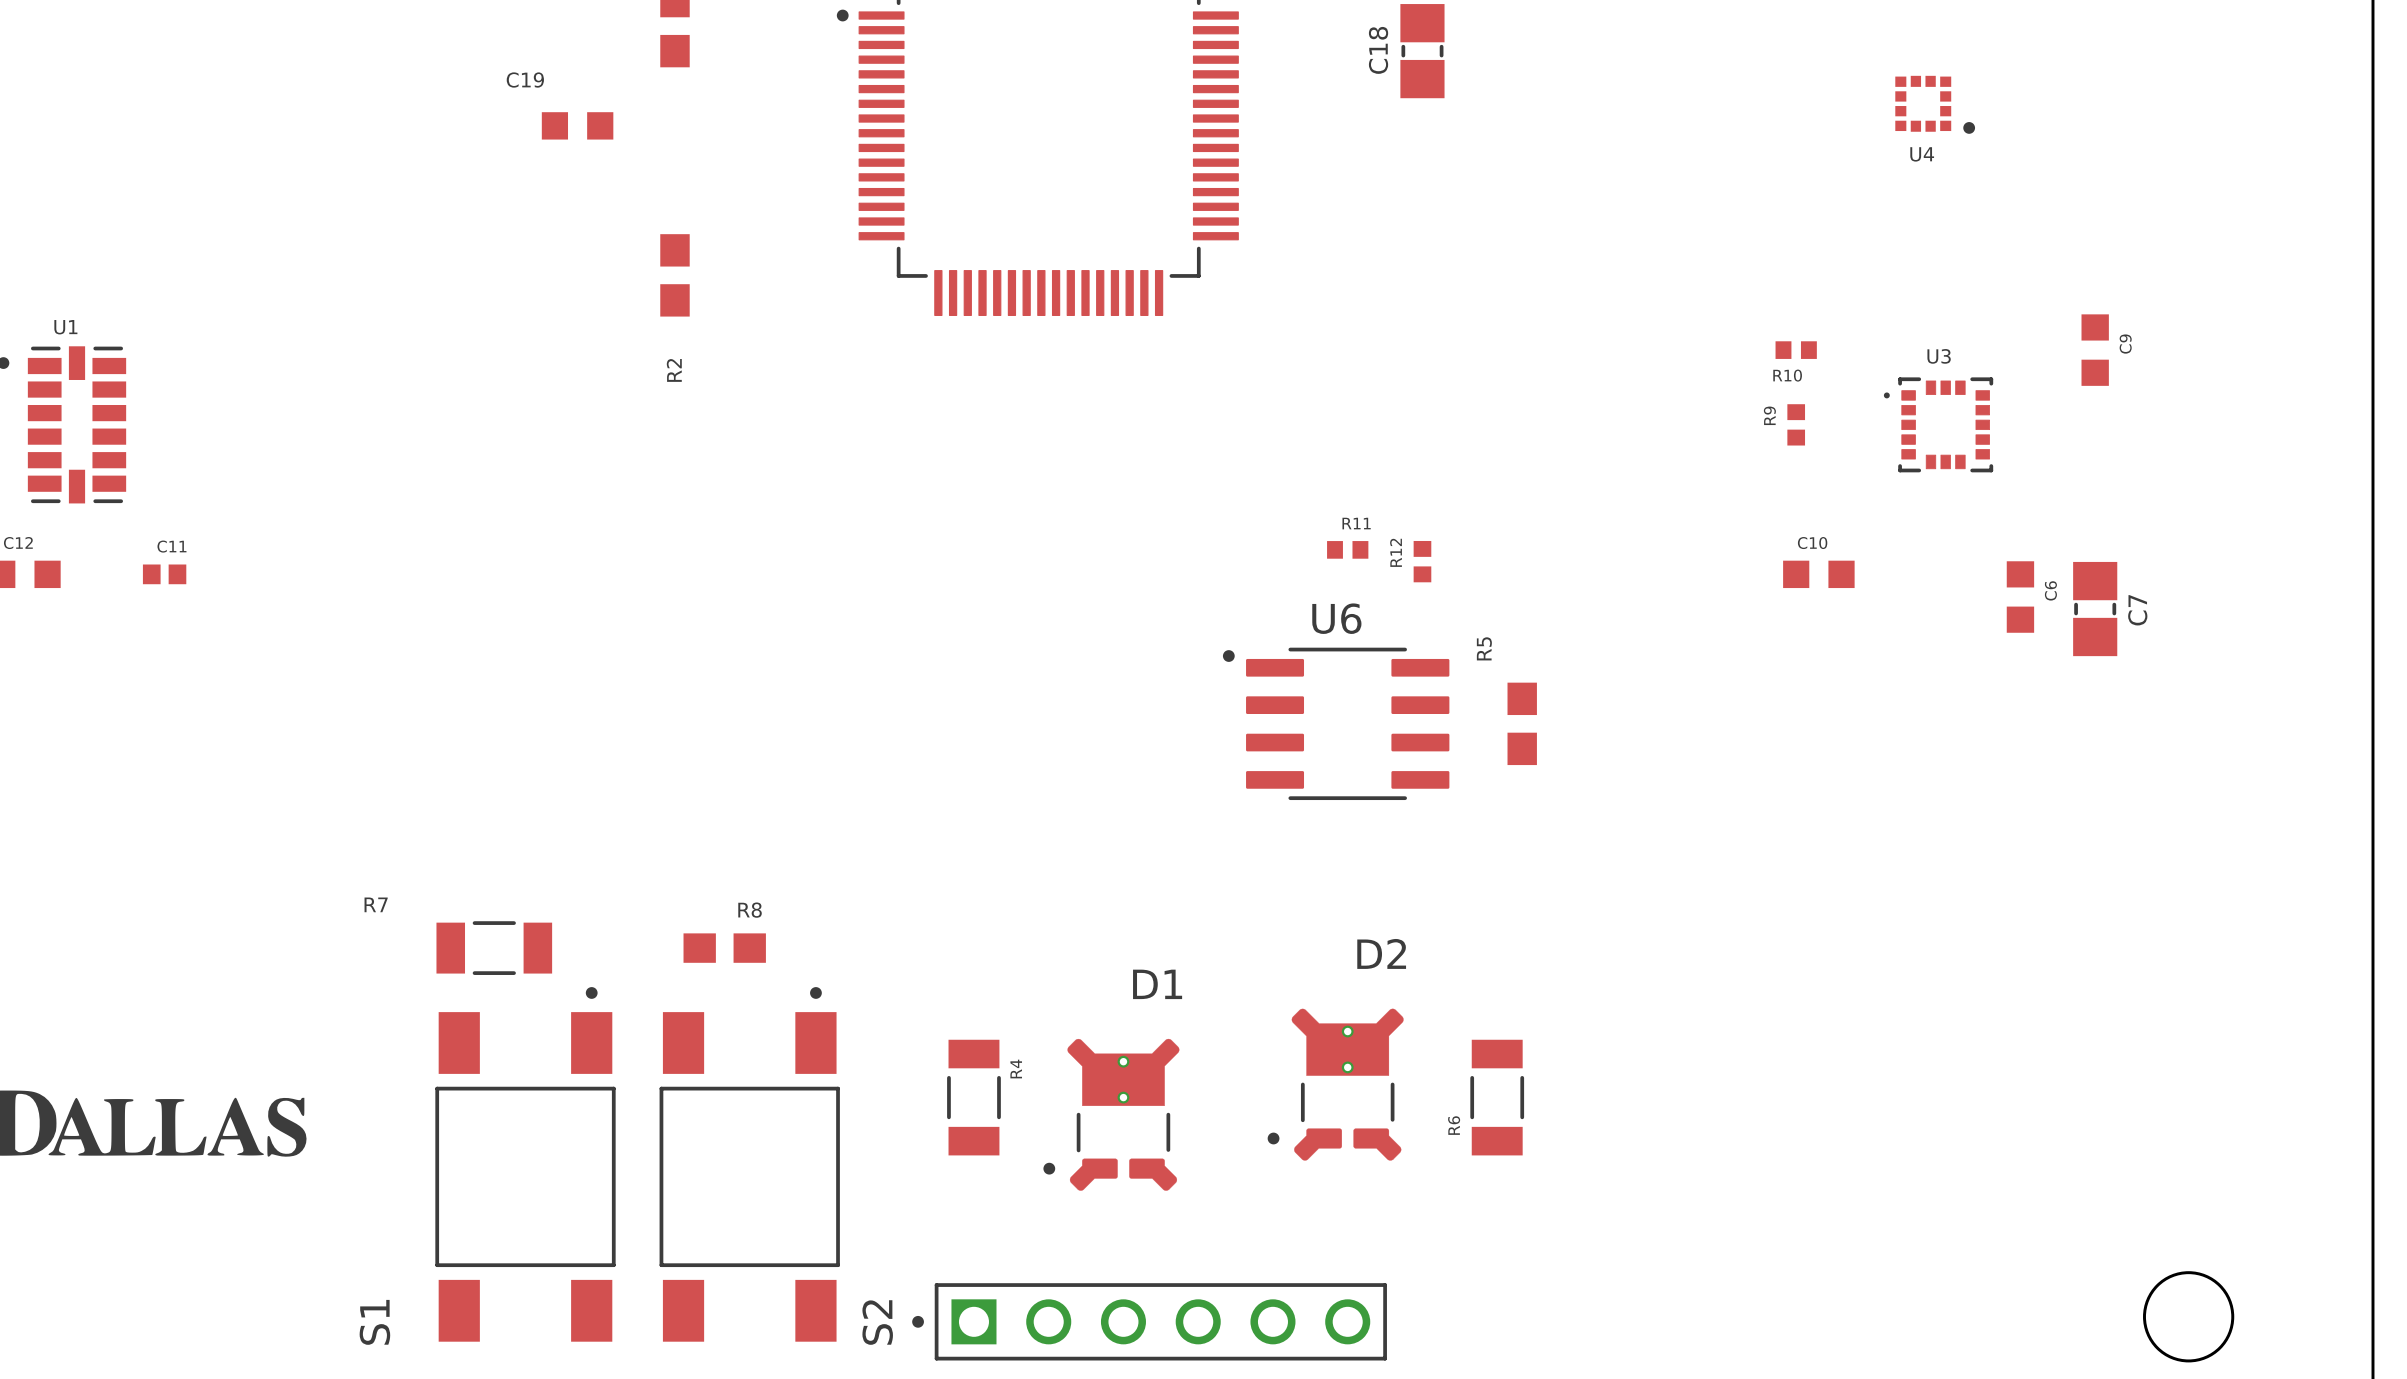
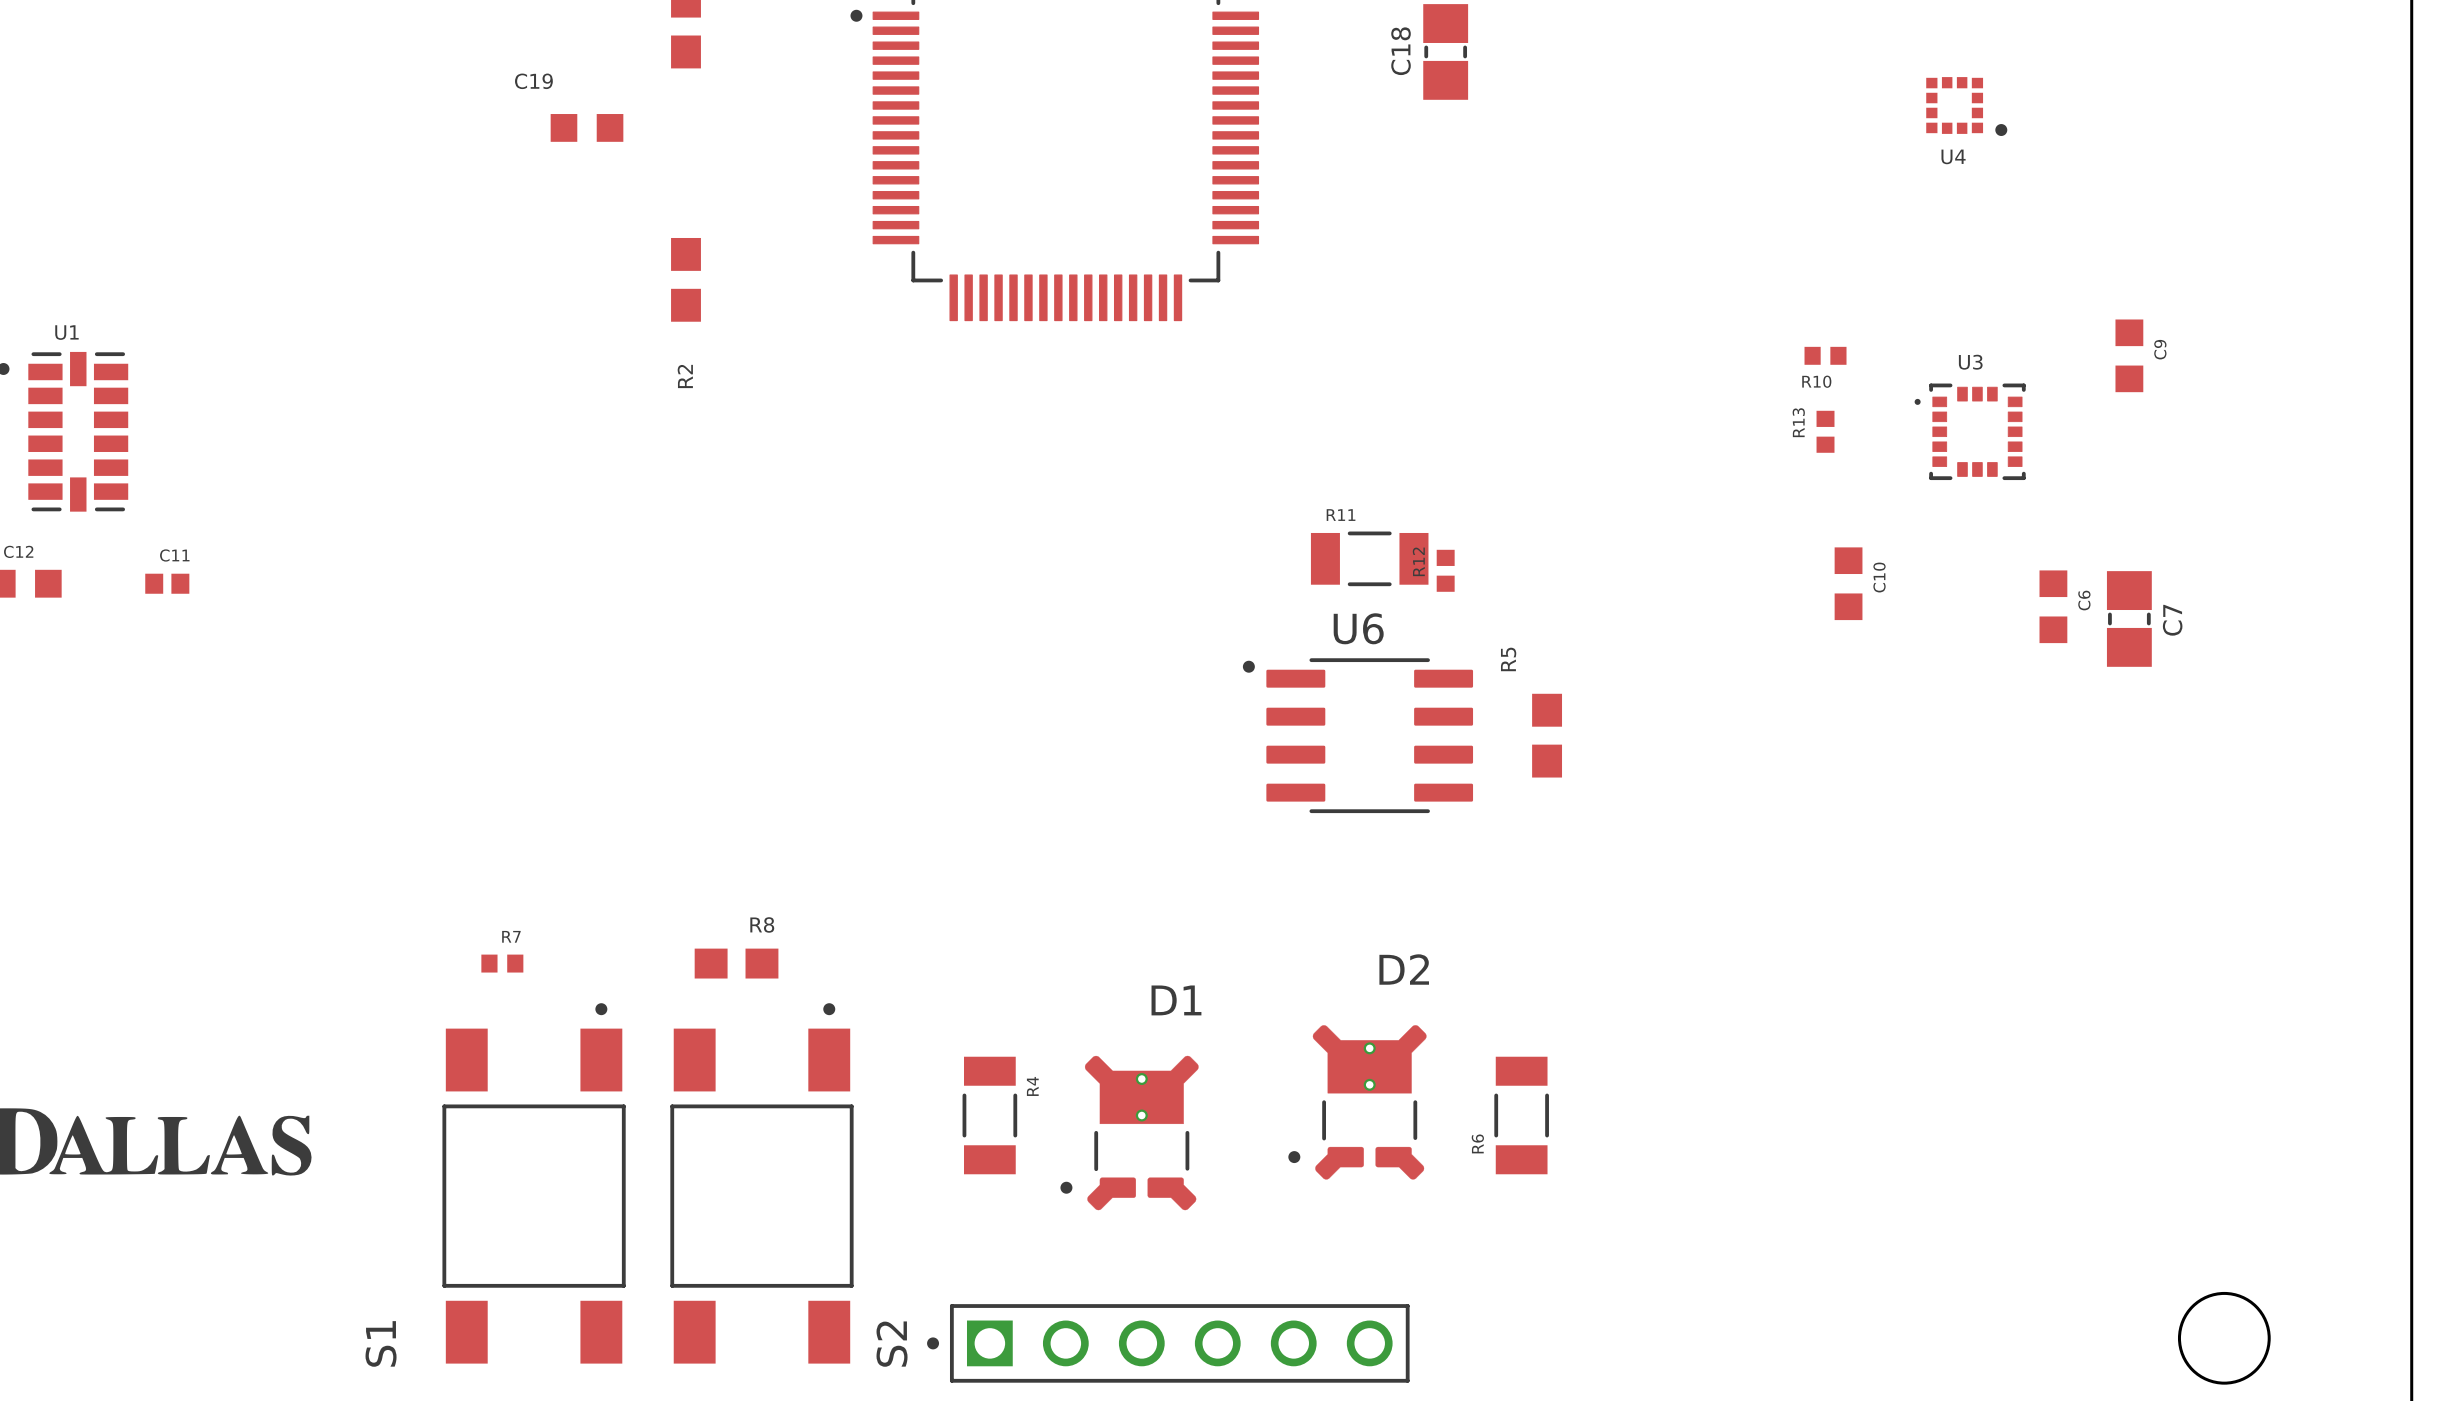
R9 name: R9 (1769, 415) -> R13 (1798, 422)
R11 footprint: [1327, 541, 1369, 559] -> [1310, 531, 1429, 587]
C10 rotation: 0° (1818, 574) -> 90° clockwise (1848, 583)
R7 name position: R7 (376, 904) -> R7 (511, 936)
R7 footprint: [436, 921, 553, 975] -> [481, 954, 524, 973]

